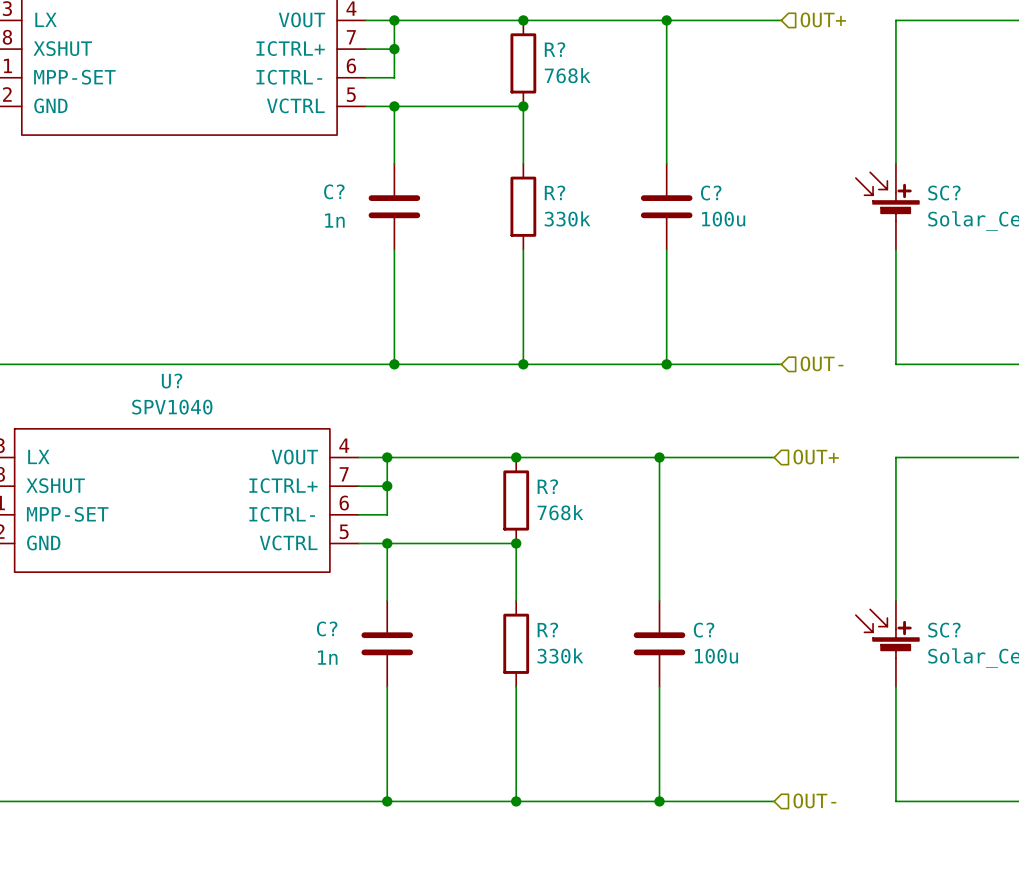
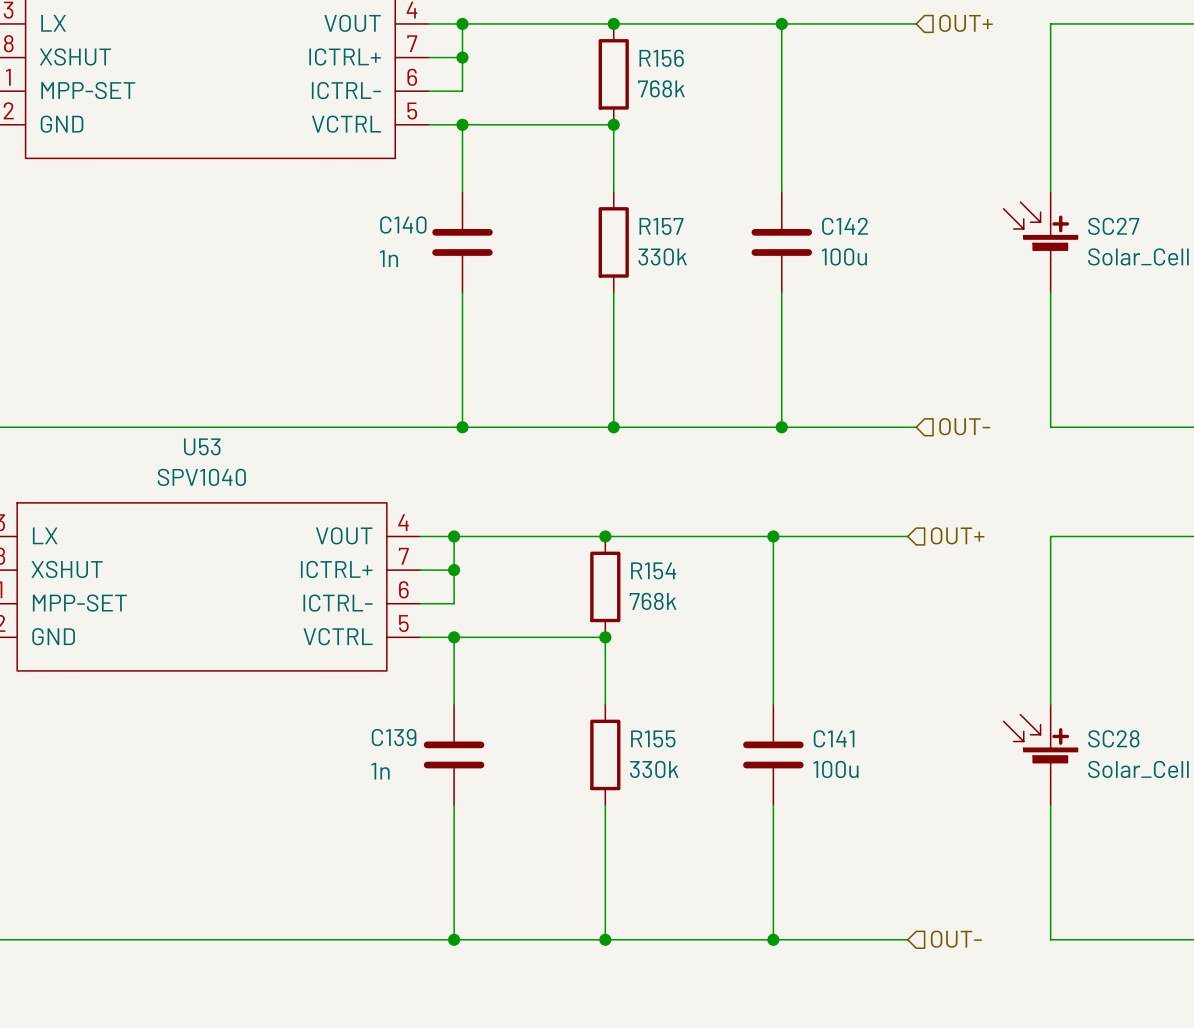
R? name: R? (555, 49) -> R156 (661, 58)
C? name: C? (334, 191) -> C140 (403, 224)
R? name: R? (555, 192) -> R157 (661, 226)
C? name: C? (711, 193) -> C142 (845, 226)
SC? name: SC? (944, 193) -> SC27 (1113, 226)
U? name: U? (172, 381) -> U53 (202, 446)
R? name: R? (547, 486) -> R154 (653, 570)
C? name: C? (327, 628) -> C139 (394, 737)
R? name: R? (547, 629) -> R155 (653, 738)
C? name: C? (704, 630) -> C141 (834, 738)
SC? name: SC? (944, 630) -> SC28 (1113, 738)

